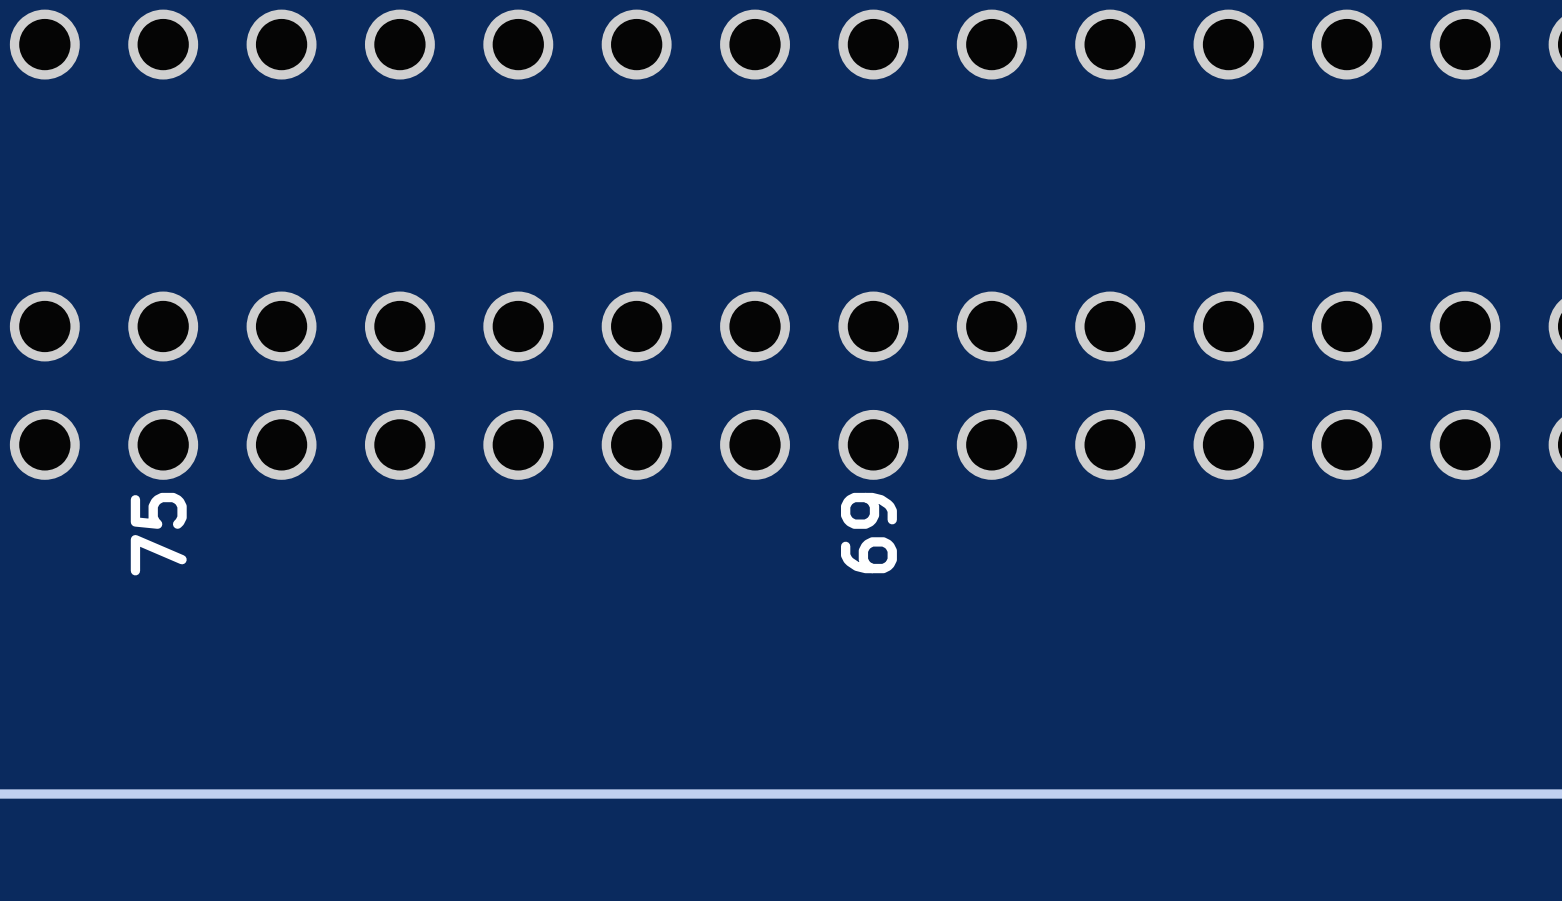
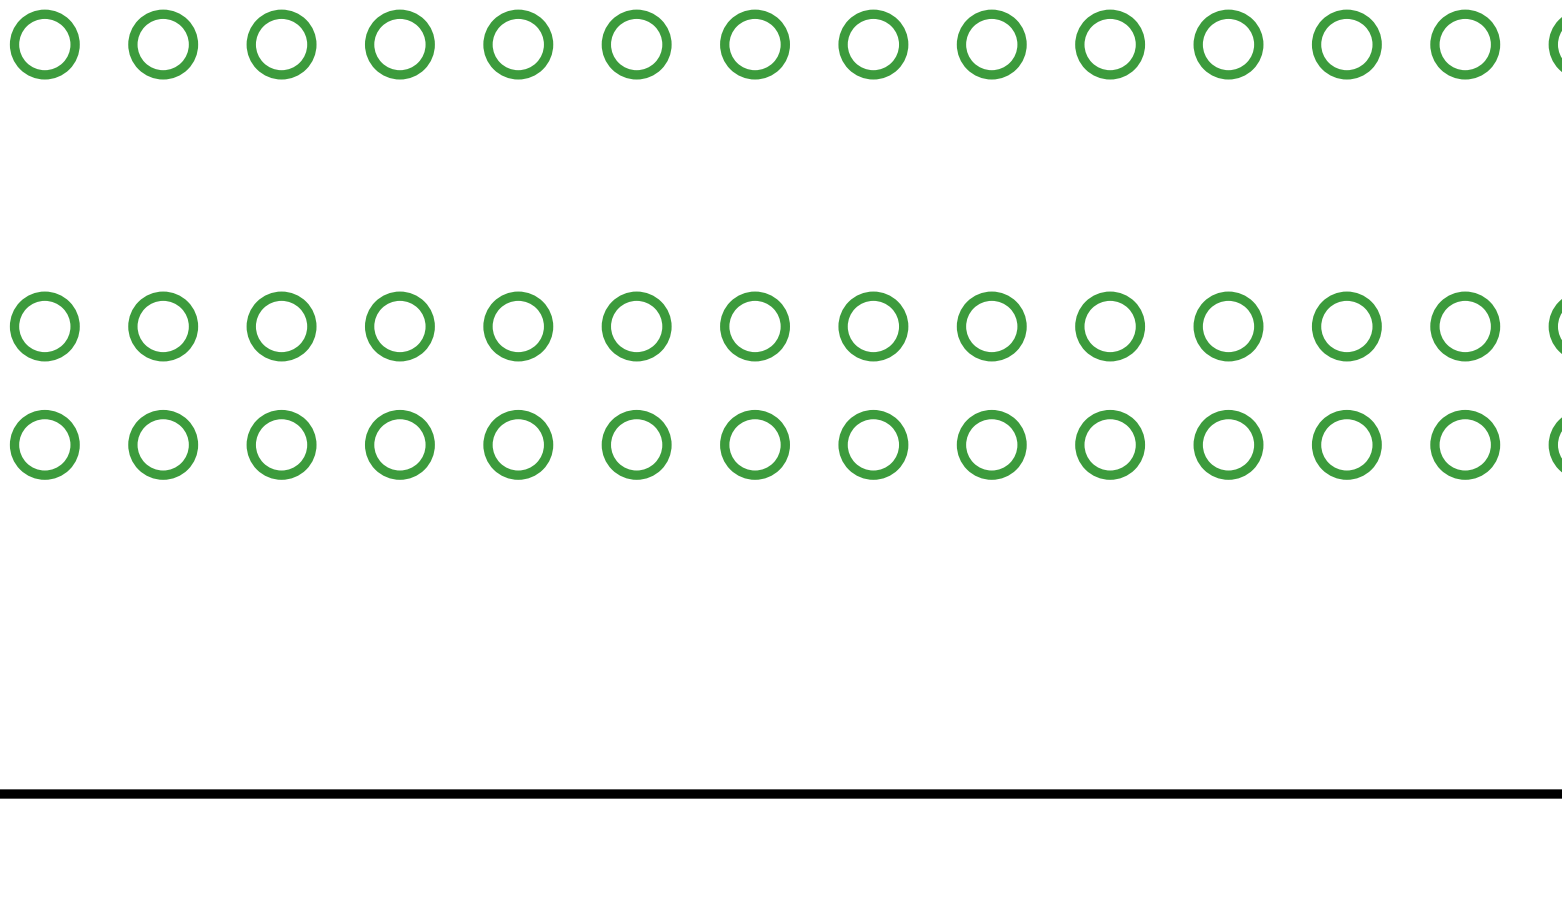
text: 69 (868, 533) -> none
text: 75 (158, 534) -> none

